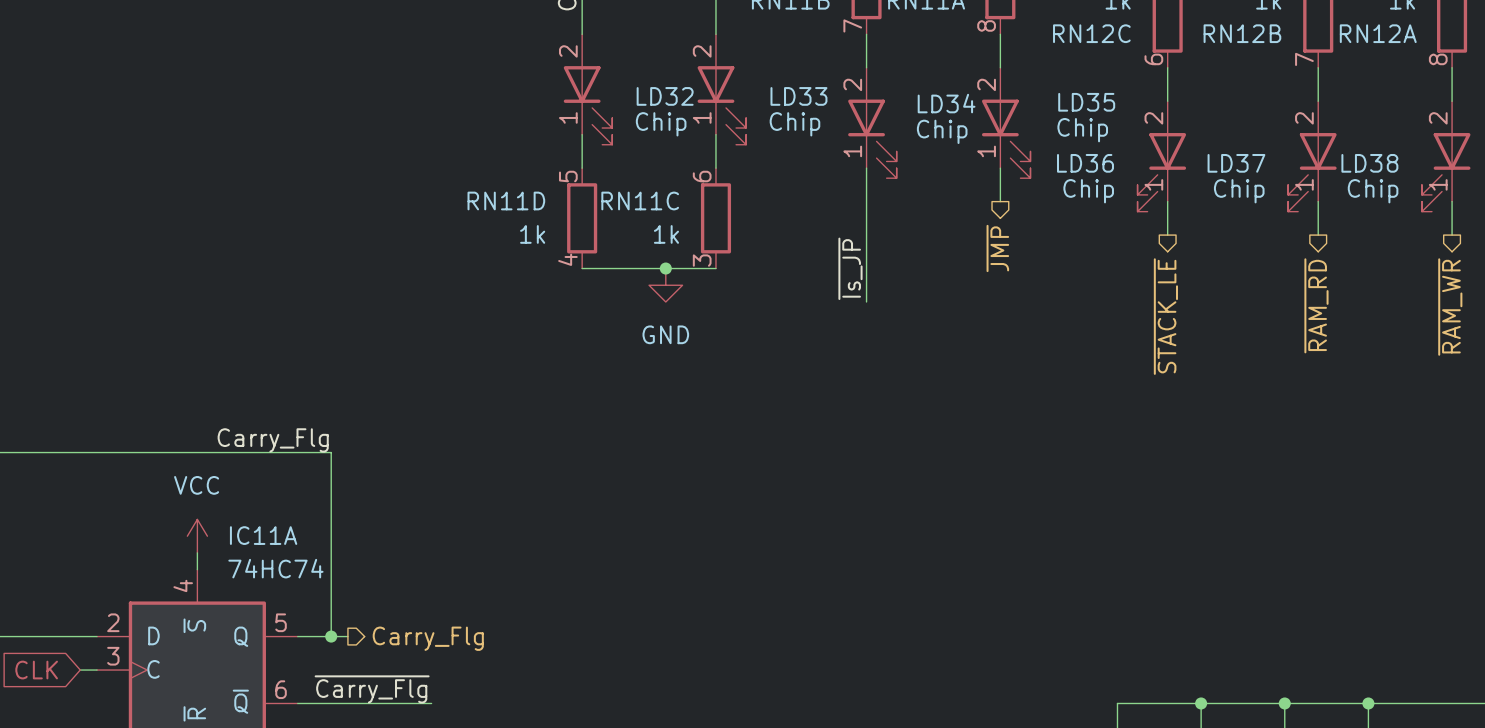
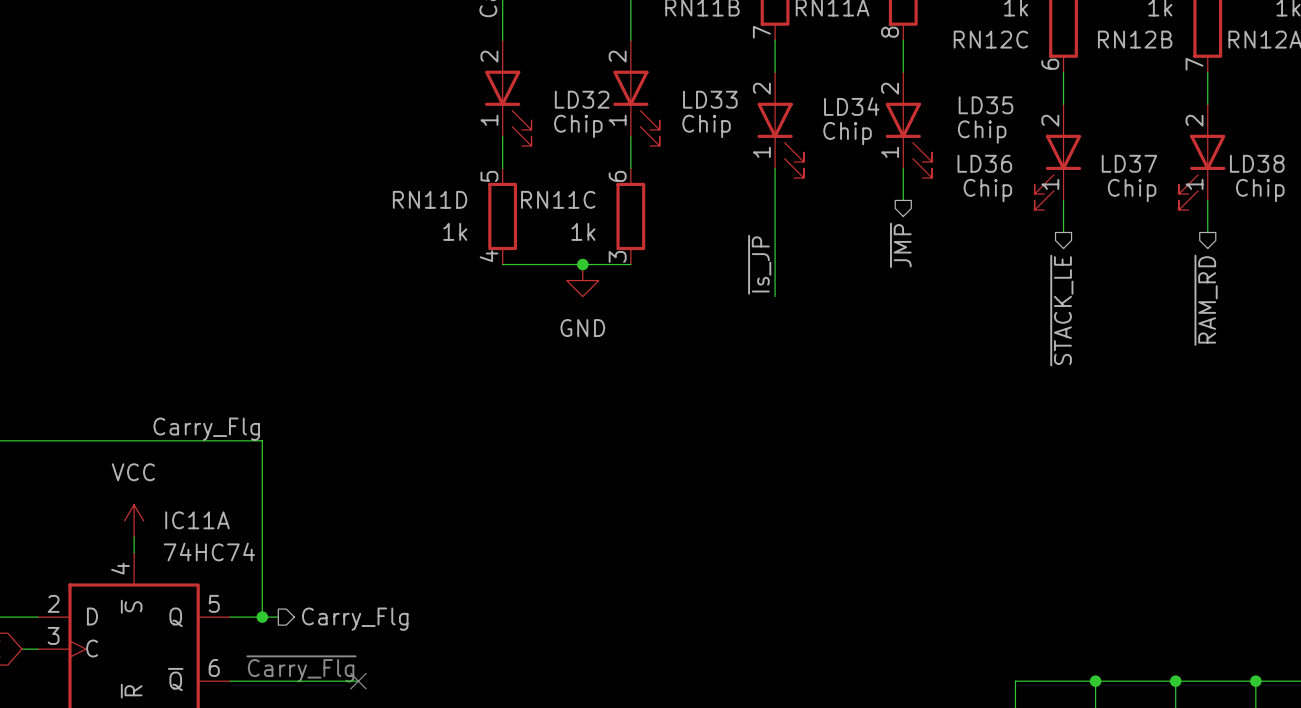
label: ~{Carry_Flg} (372, 689) -> none
text: none -> ~{Carry_Flg} (301, 668)
no-connect mark: none -> (358, 681)

